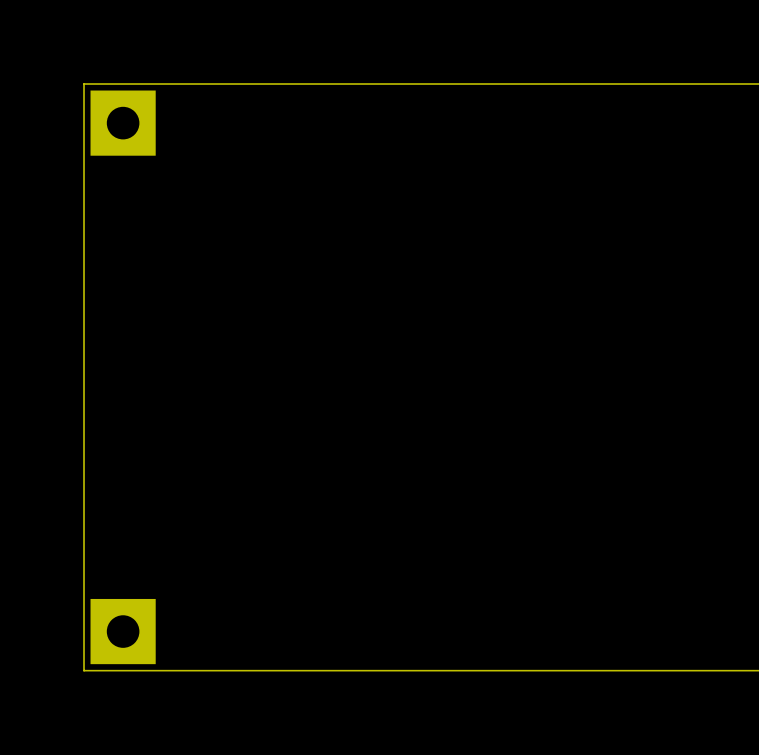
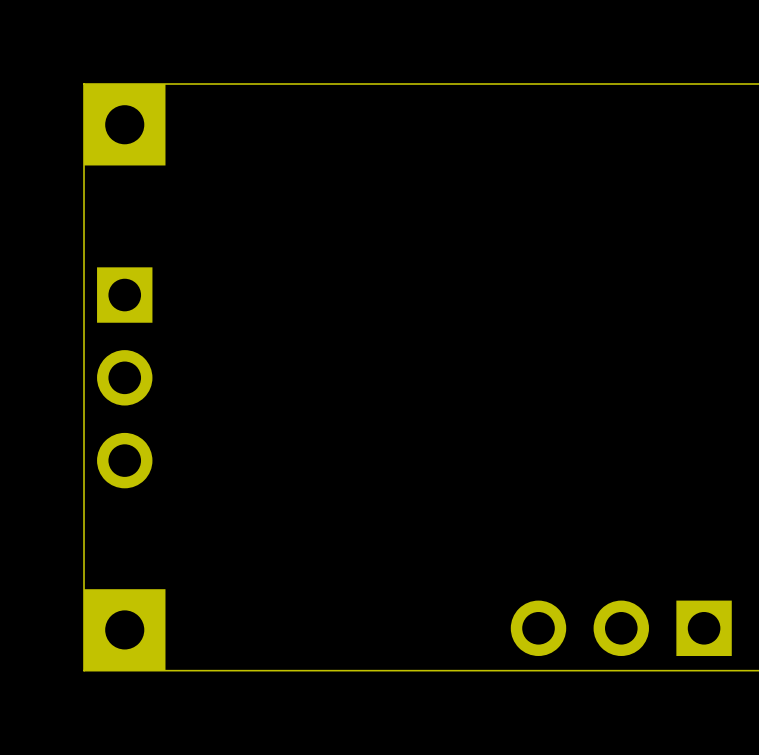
part footprint: [90, 90, 156, 156] -> [84, 84, 166, 166]
part: none -> (124, 377)
part footprint: [90, 598, 156, 665] -> [84, 589, 166, 671]
part: none -> (621, 628)

